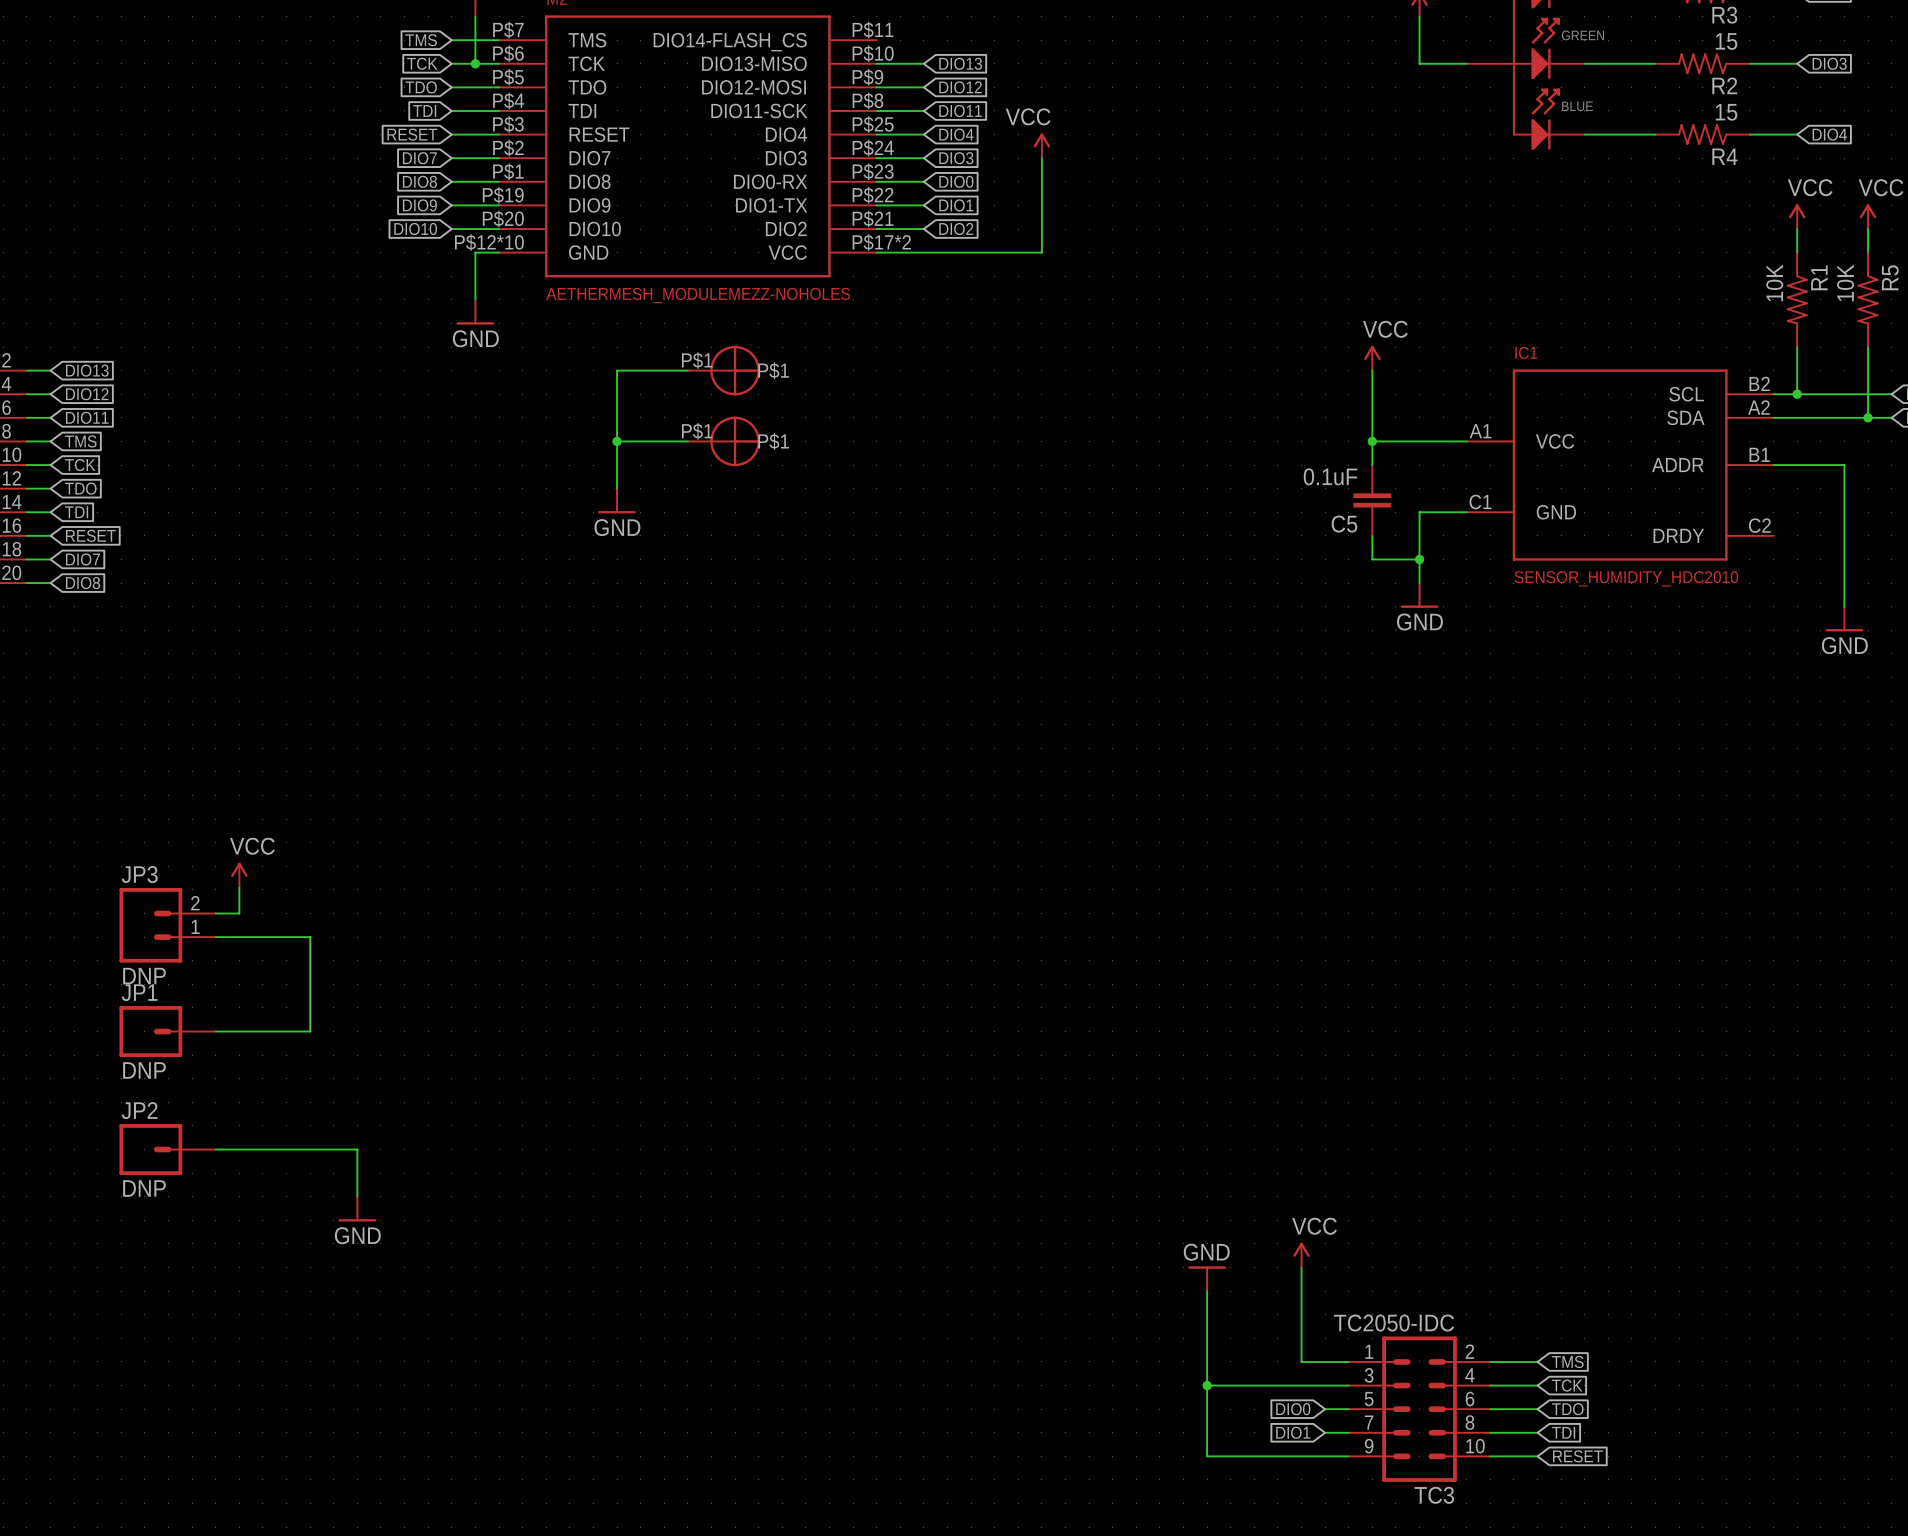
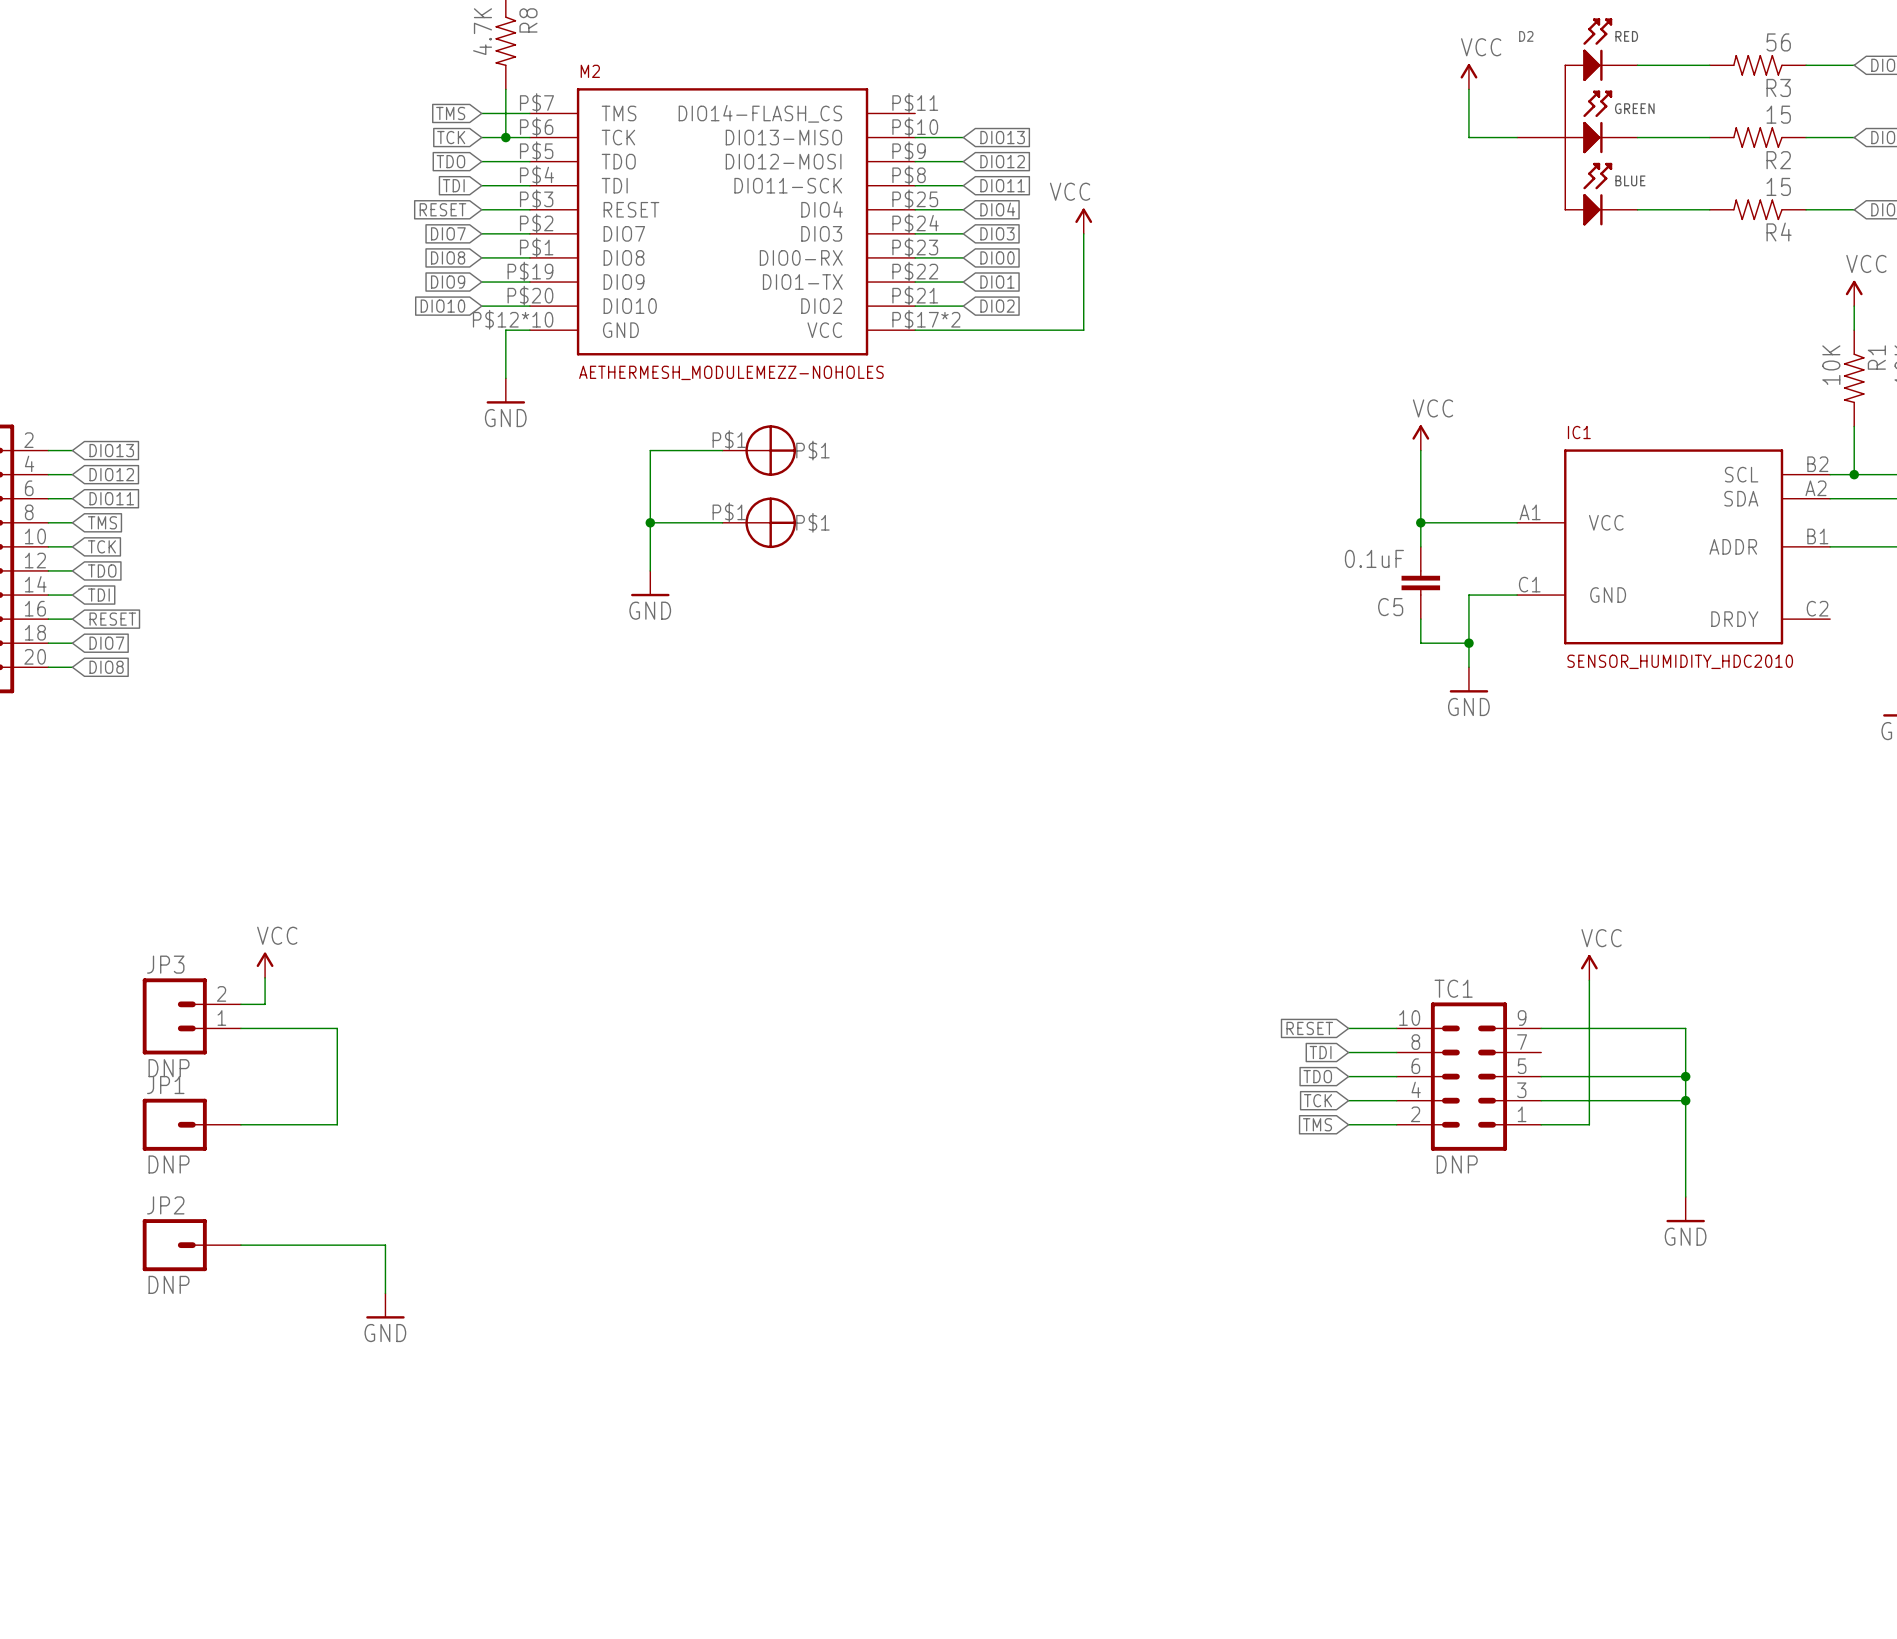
power symbol: none -> VCC (1589, 967)
wire: none -> (1589, 980) (1589, 1124) (1541, 1124)
global label: none -> RESET (1309, 1028)
wire: none -> (1348, 1028) (1396, 1028)
wire: none -> (1541, 1028) (1685, 1028) (1685, 1196)
global label: none -> TDI (1320, 1052)
wire: none -> (1348, 1052) (1396, 1052)
global label: none -> TDO (1317, 1076)
wire: none -> (1348, 1076) (1396, 1076)
TC1: none -> DNP (1468, 1076)
wire: none -> (1541, 1076) (1685, 1076)
junction: none -> (1685, 1076)
global label: none -> TCK (1318, 1100)
wire: none -> (1348, 1100) (1396, 1100)
wire: none -> (1541, 1100) (1685, 1100)
junction: none -> (1685, 1100)
global label: none -> TMS (1317, 1124)
wire: none -> (1348, 1124) (1396, 1124)
power symbol: none -> GND (1685, 1209)
power symbol: VCC (1301, 1255) -> none
wire: (1301, 1267) (1301, 1361) (1348, 1361) -> none
power symbol: GND (1207, 1278) -> none
wire: (1207, 1291) (1207, 1456) (1348, 1456) -> none
wire: (1490, 1361) (1537, 1361) -> none
global label: TMS (1567, 1361) -> none
wire: (1207, 1385) (1348, 1385) -> none
junction: (1207, 1385) -> none
wire: (1490, 1385) (1537, 1385) -> none
global label: TCK (1567, 1385) -> none
global label: DIO0 (1293, 1409) -> none
wire: (1325, 1409) (1348, 1409) -> none
TC3: TC2050-IDC (1419, 1409) -> none
wire: (1490, 1409) (1537, 1409) -> none
global label: TDO (1567, 1409) -> none
global label: DIO1 (1293, 1432) -> none
wire: (1325, 1432) (1348, 1432) -> none
wire: (1490, 1432) (1537, 1432) -> none
global label: TDI (1563, 1432) -> none
wire: (1490, 1456) (1537, 1456) -> none
global label: RESET (1577, 1456) -> none

